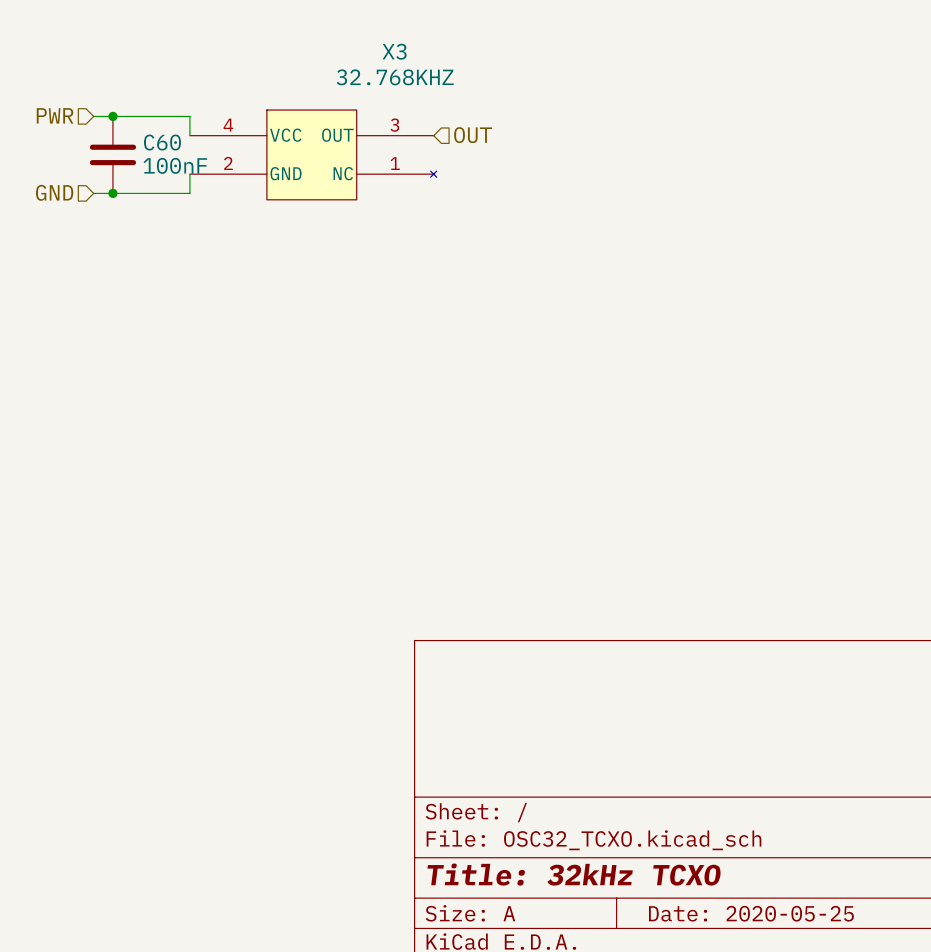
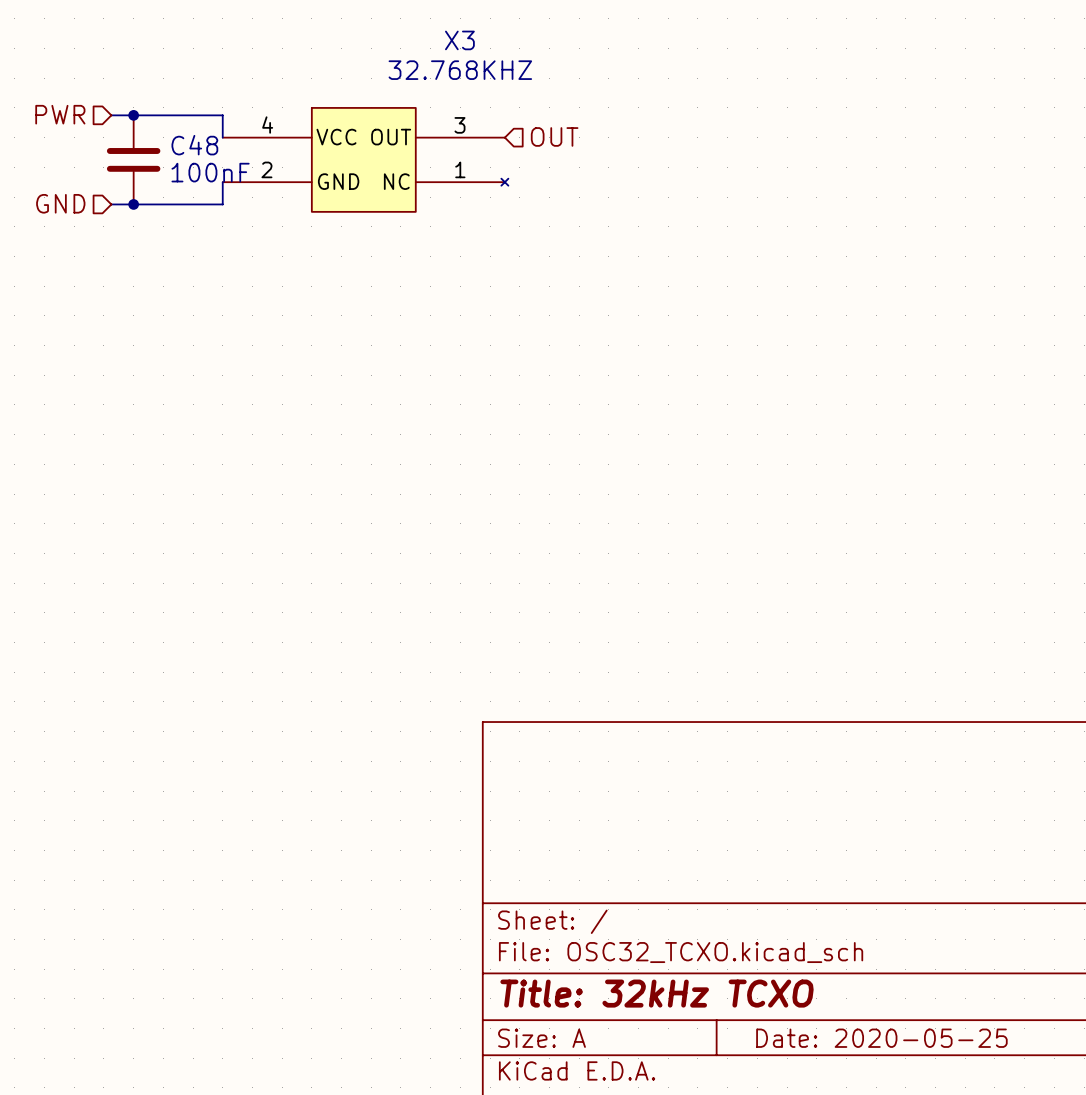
C60 name: C60 (162, 142) -> C48 (194, 145)

